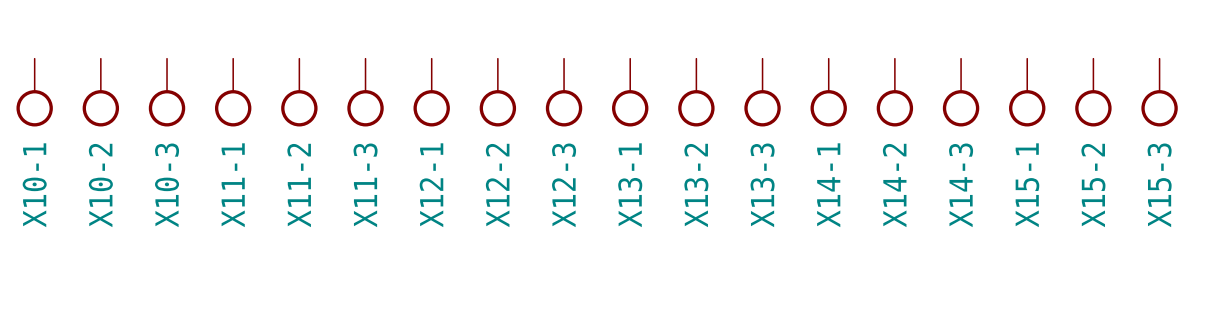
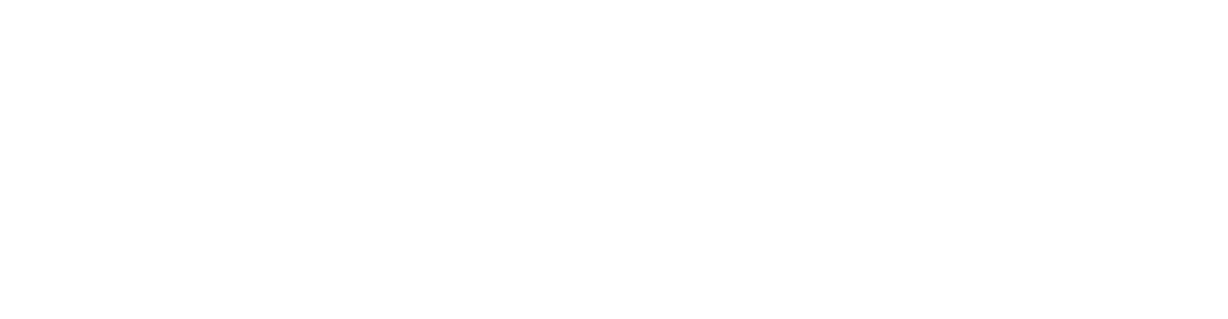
X10-1: (34, 92) -> none
X10-2: (100, 92) -> none
X10-3: (167, 92) -> none
X11-1: (233, 92) -> none
X11-2: (299, 92) -> none
X11-3: (365, 92) -> none
X12-1: (431, 92) -> none
X12-2: (497, 92) -> none
X12-3: (564, 92) -> none
X13-1: (630, 92) -> none
X13-2: (696, 92) -> none
X13-3: (762, 92) -> none
X14-1: (828, 92) -> none
X14-2: (894, 92) -> none
X14-3: (961, 92) -> none
X15-1: (1027, 92) -> none
X15-2: (1093, 92) -> none
X15-3: (1159, 92) -> none

